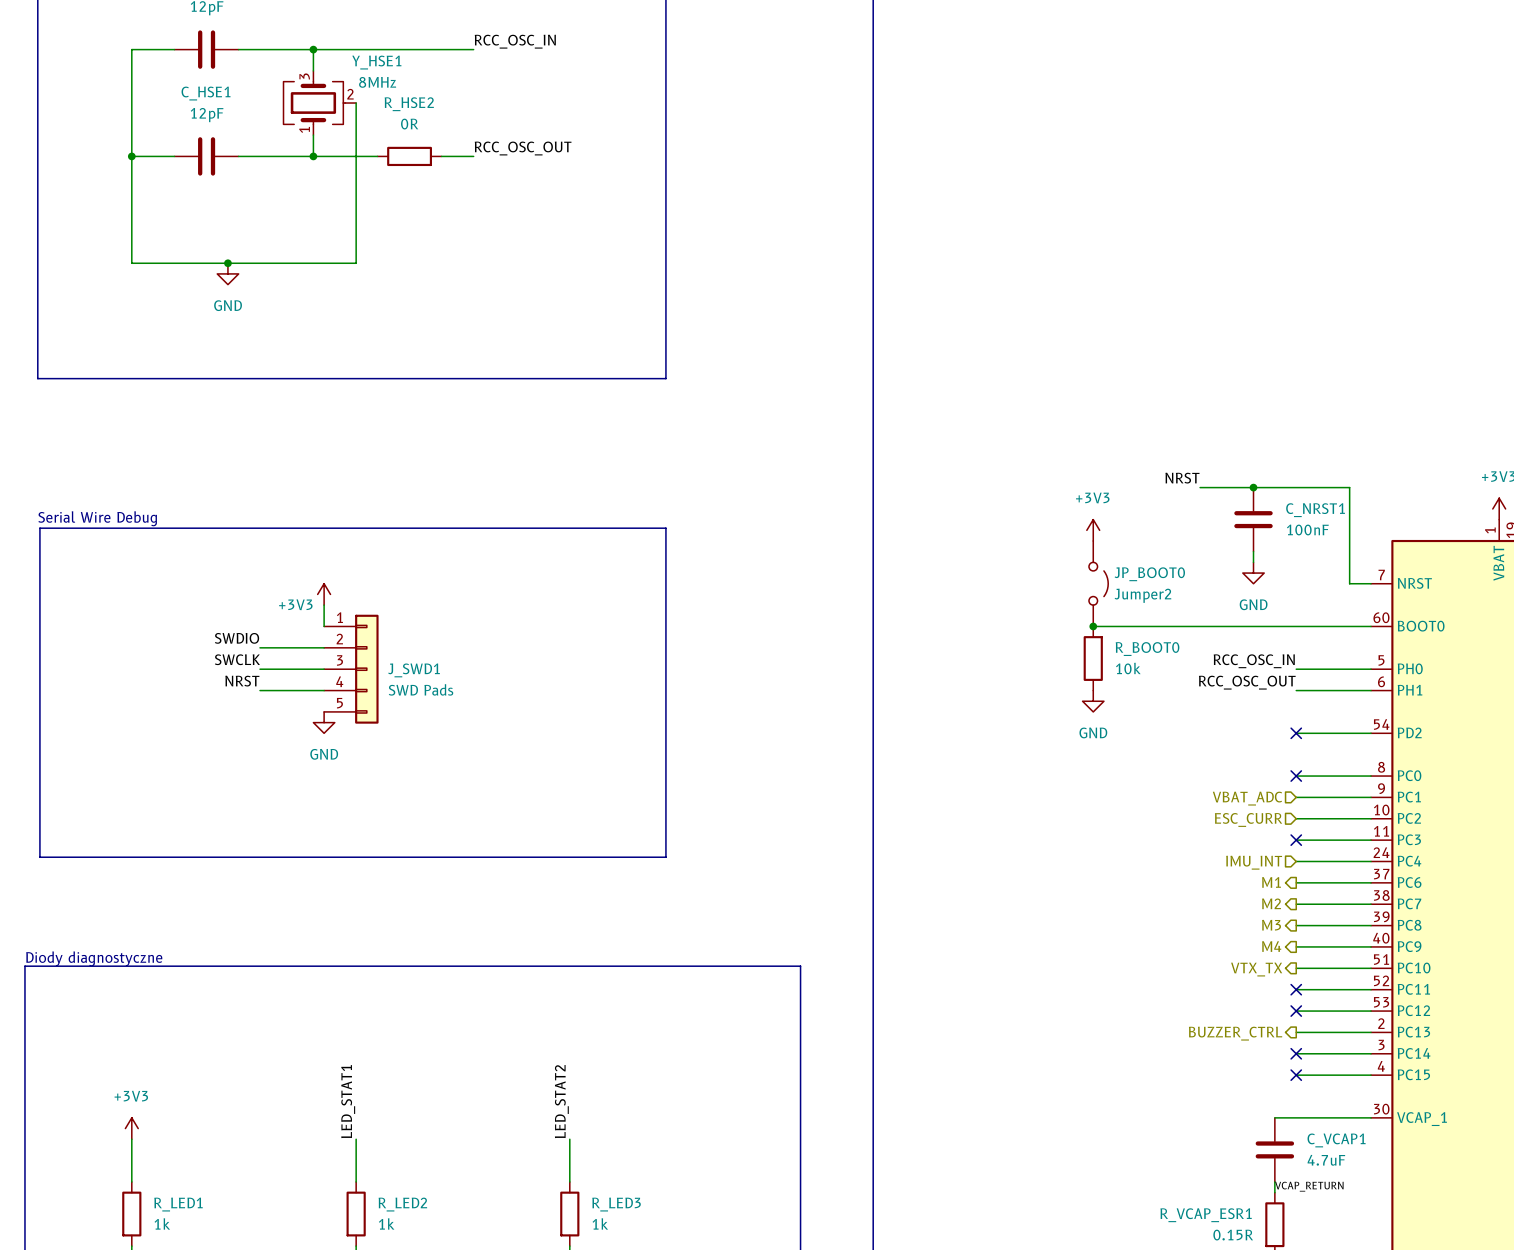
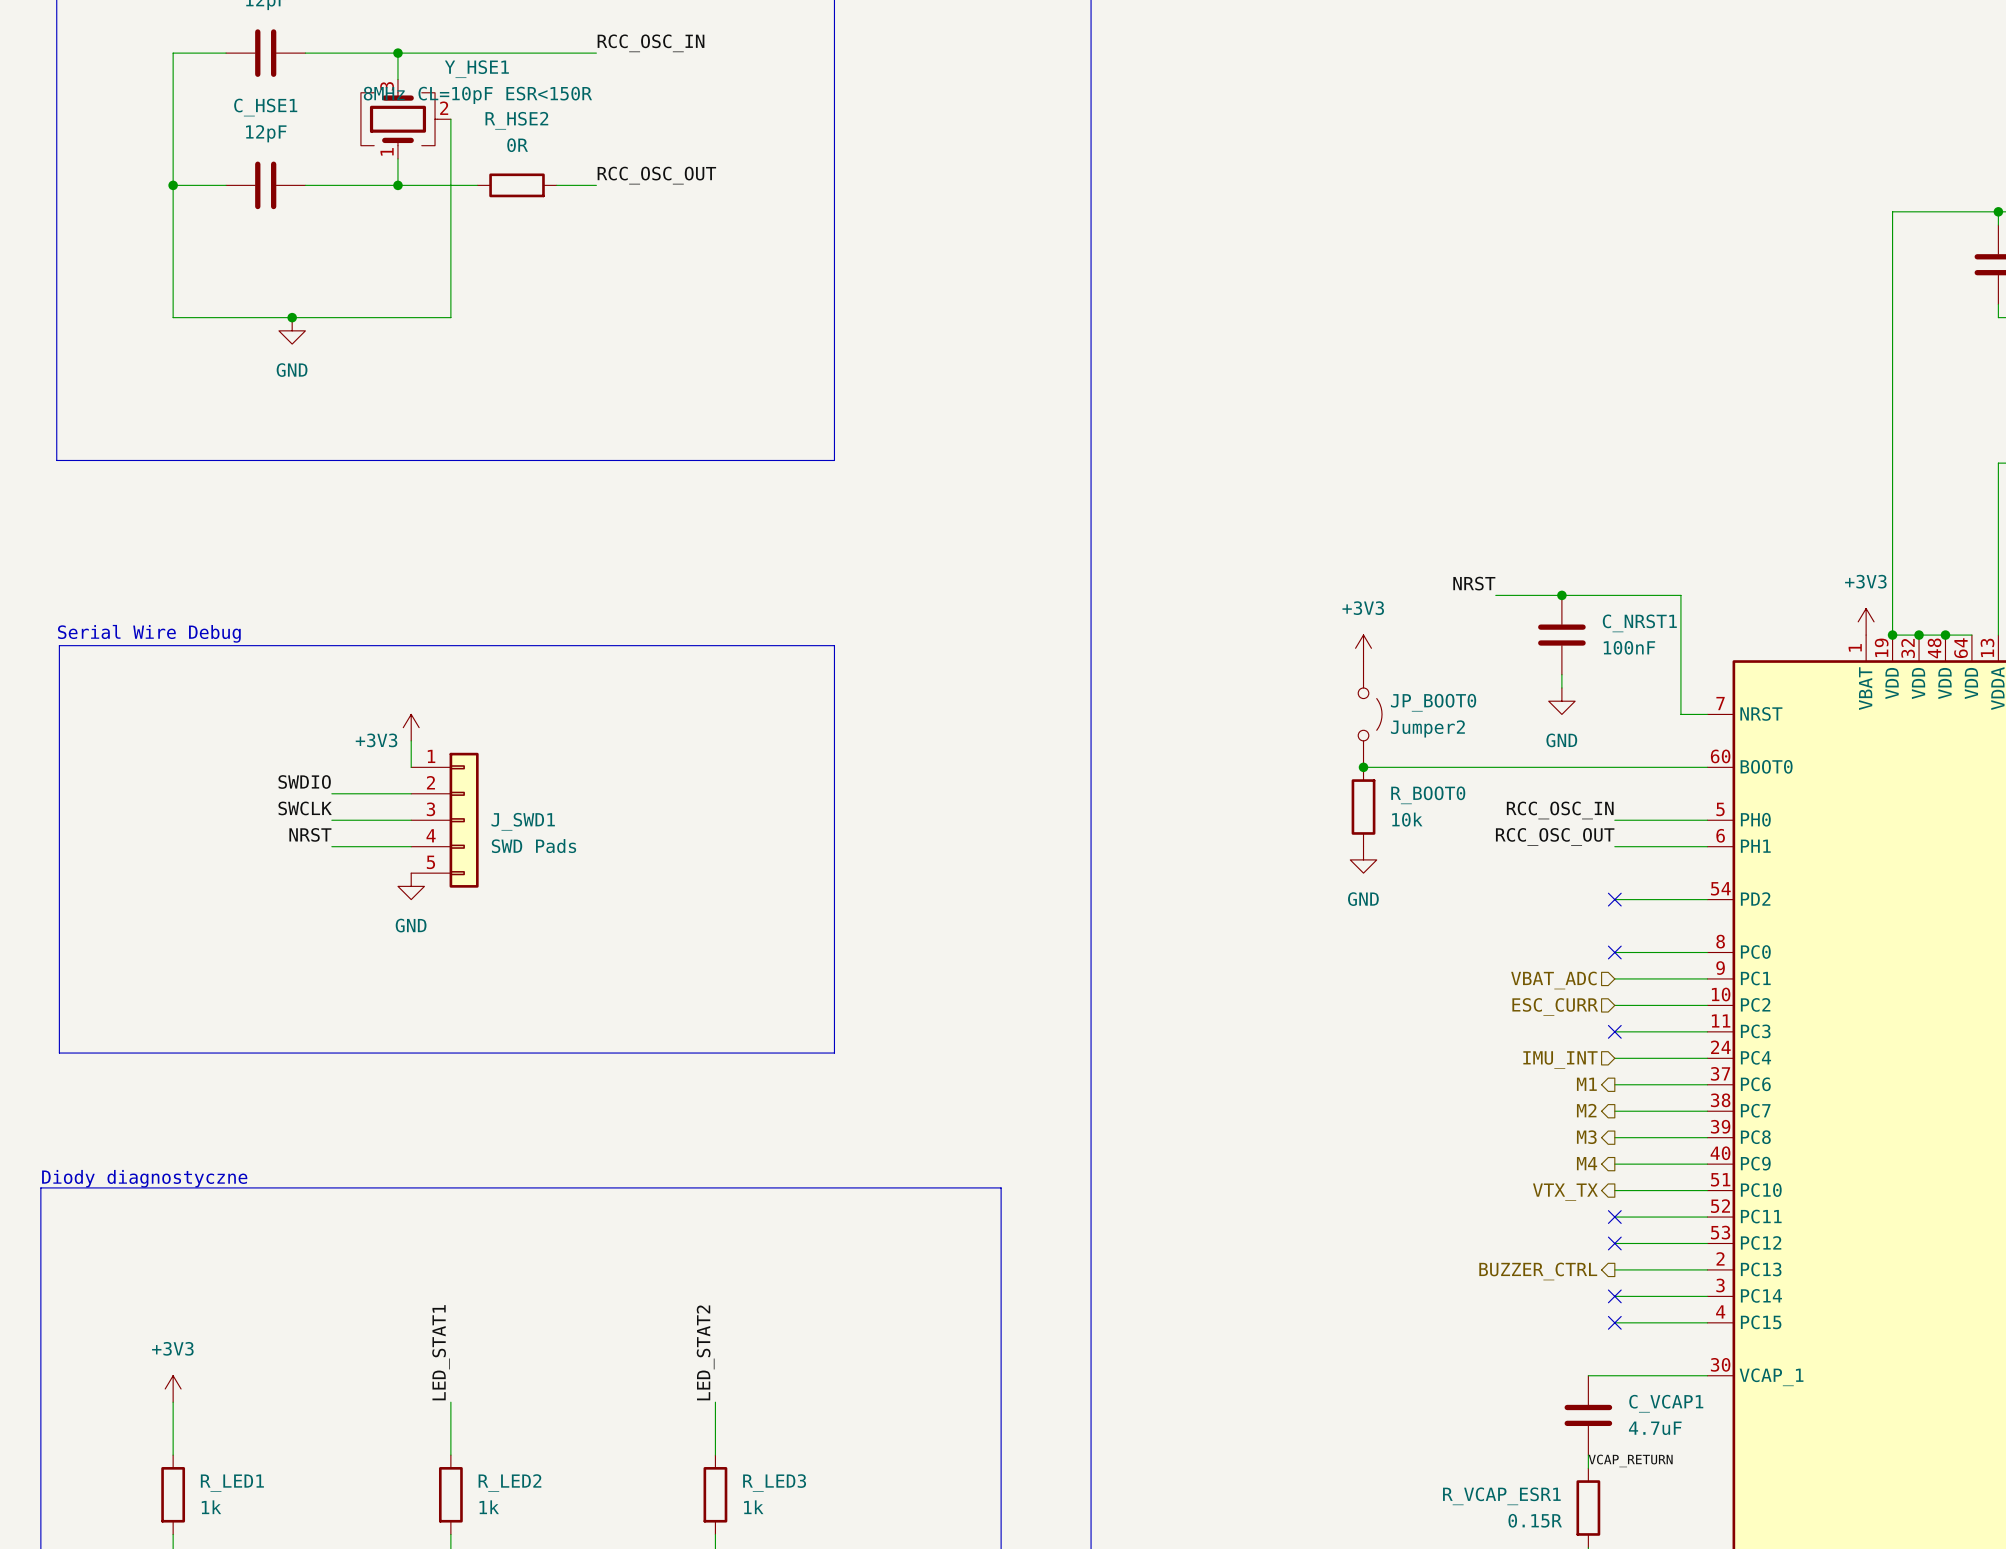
Y_HSE1 value: 8MHz (377, 82) -> 8MHz CL=10pF ESR<150R (477, 95)

